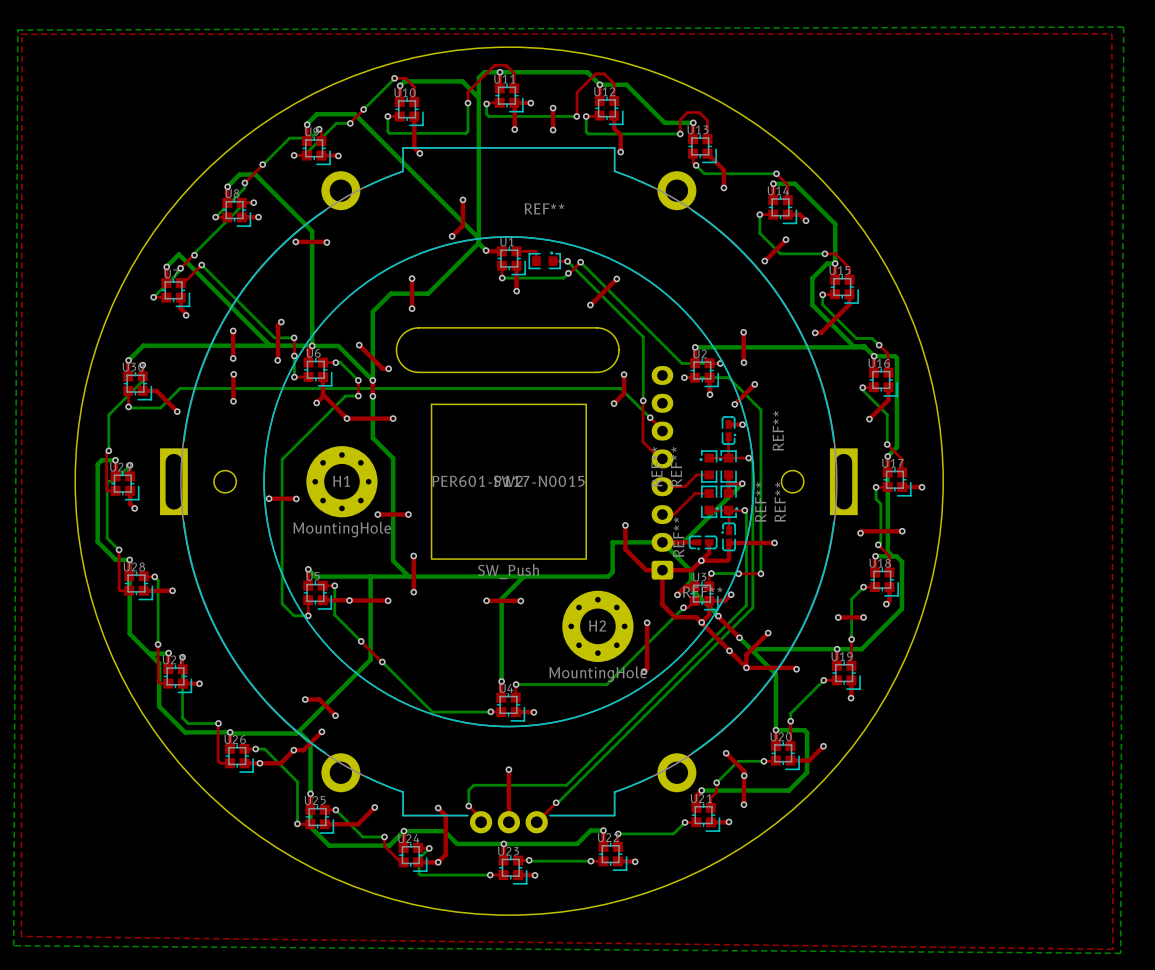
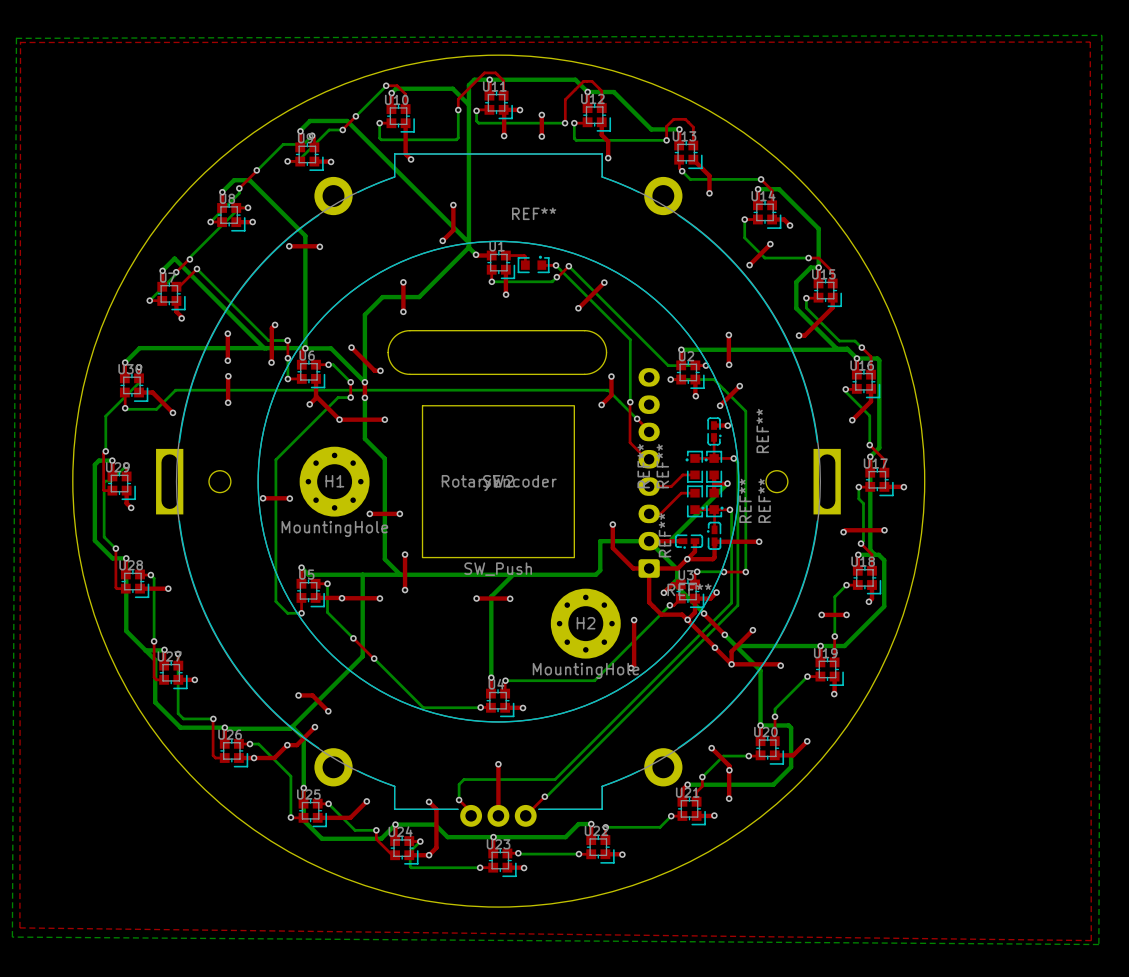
part value: PER601-P117-N0015 (508, 481) -> RotaryEncoder (499, 483)

